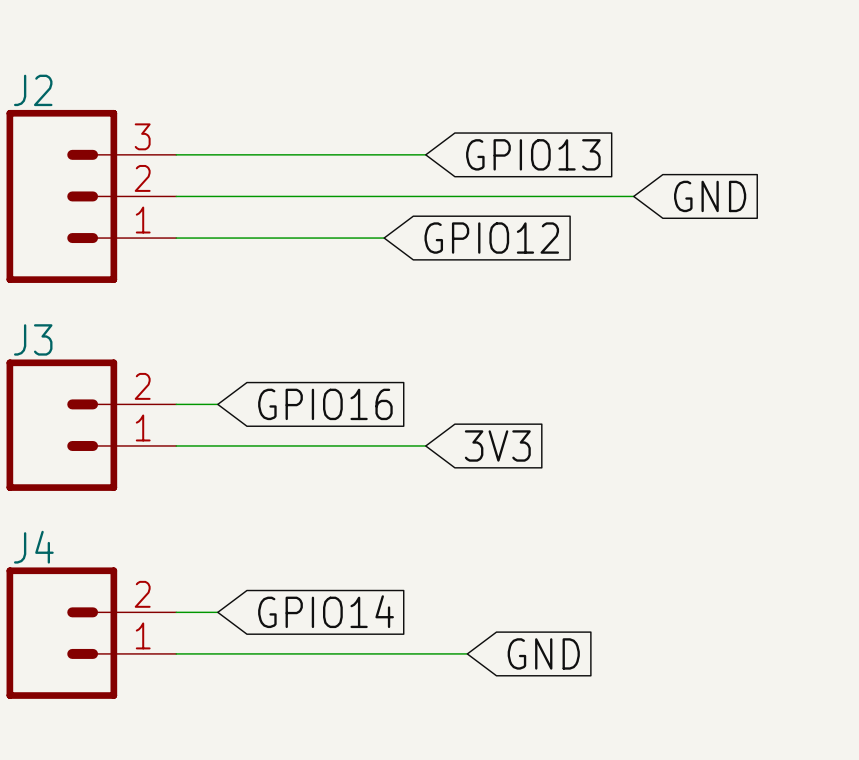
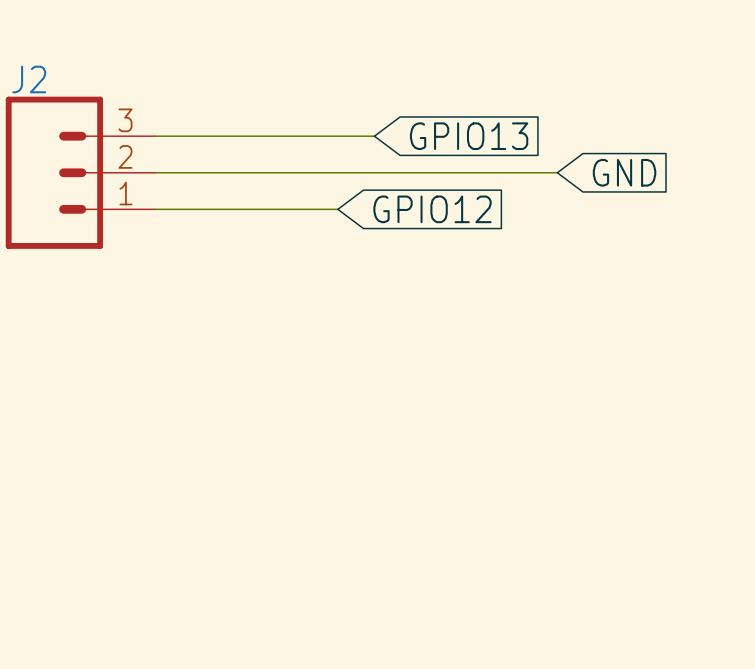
wire: (176, 404) (217, 404) -> none
global label: GPIO16 (325, 404) -> none
J3: (91, 425) -> none
wire: (176, 445) (425, 445) -> none
global label: 3V3 (497, 445) -> none
global label: GPIO14 (326, 611) -> none
wire: (176, 612) (217, 612) -> none
J4: (91, 633) -> none
wire: (176, 653) (467, 653) -> none
global label: GND (543, 653) -> none

